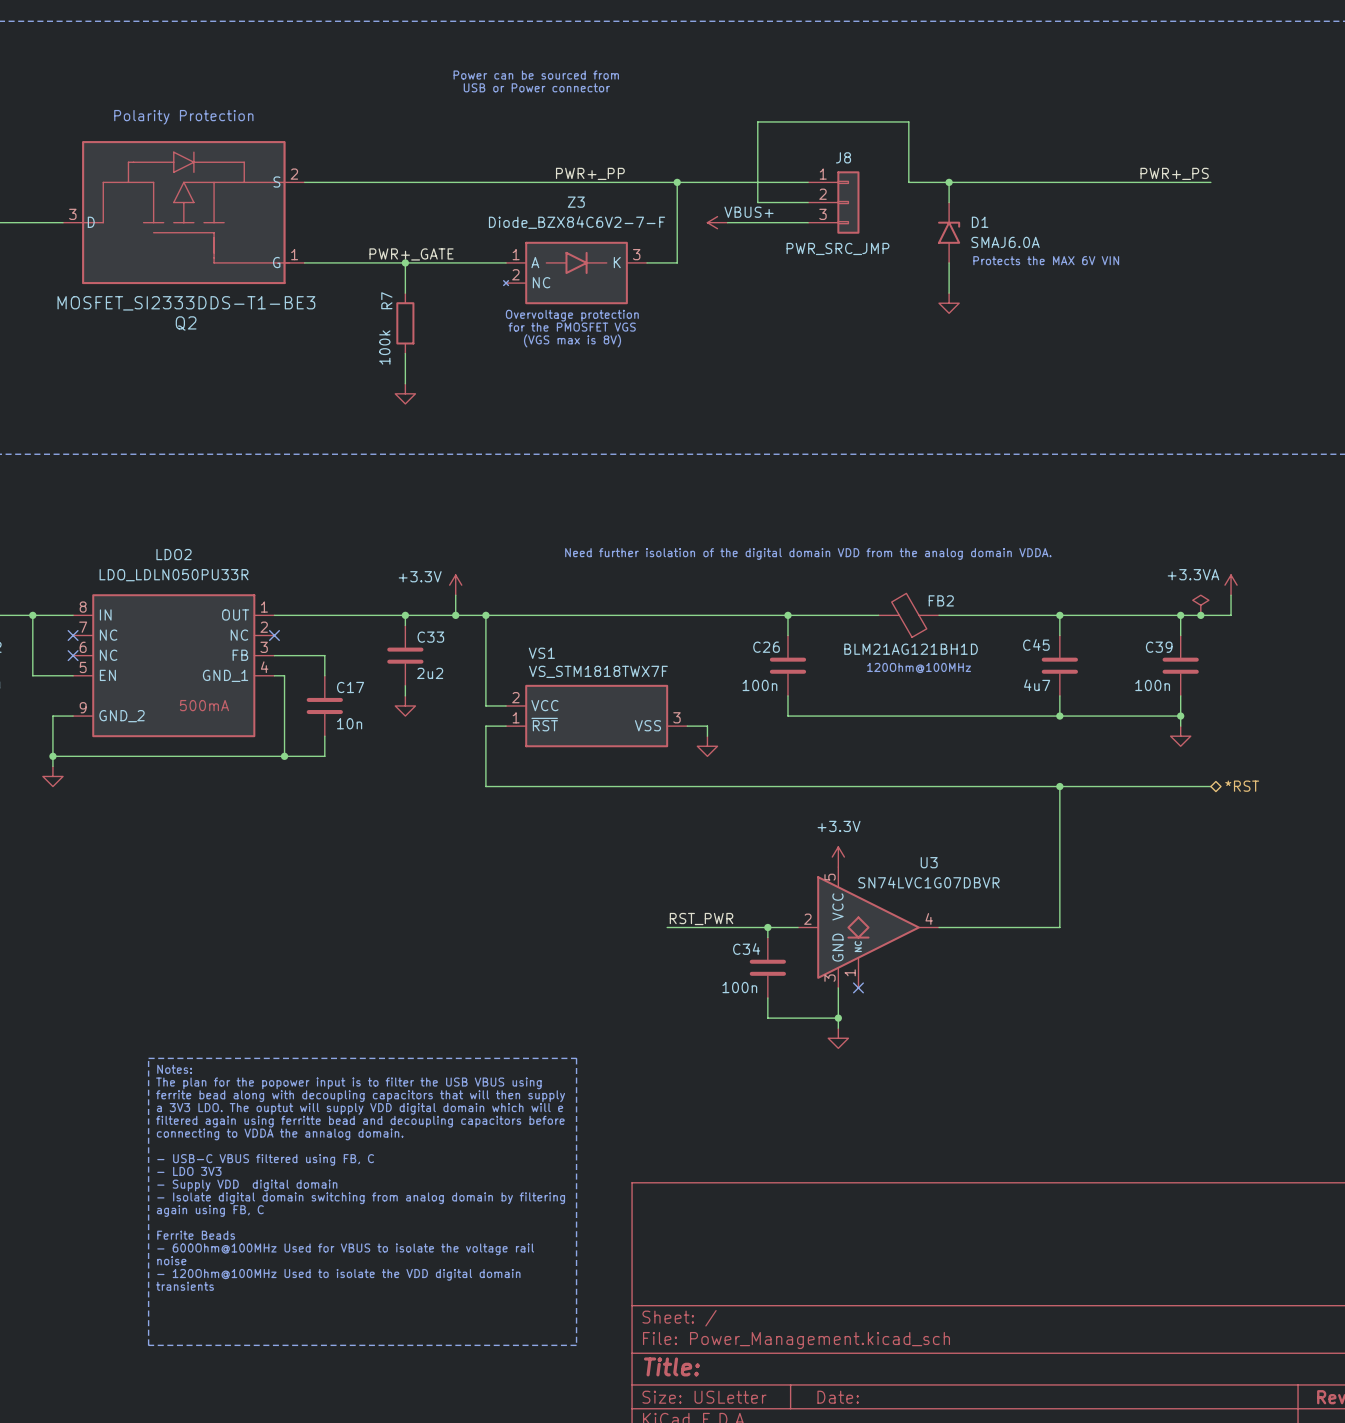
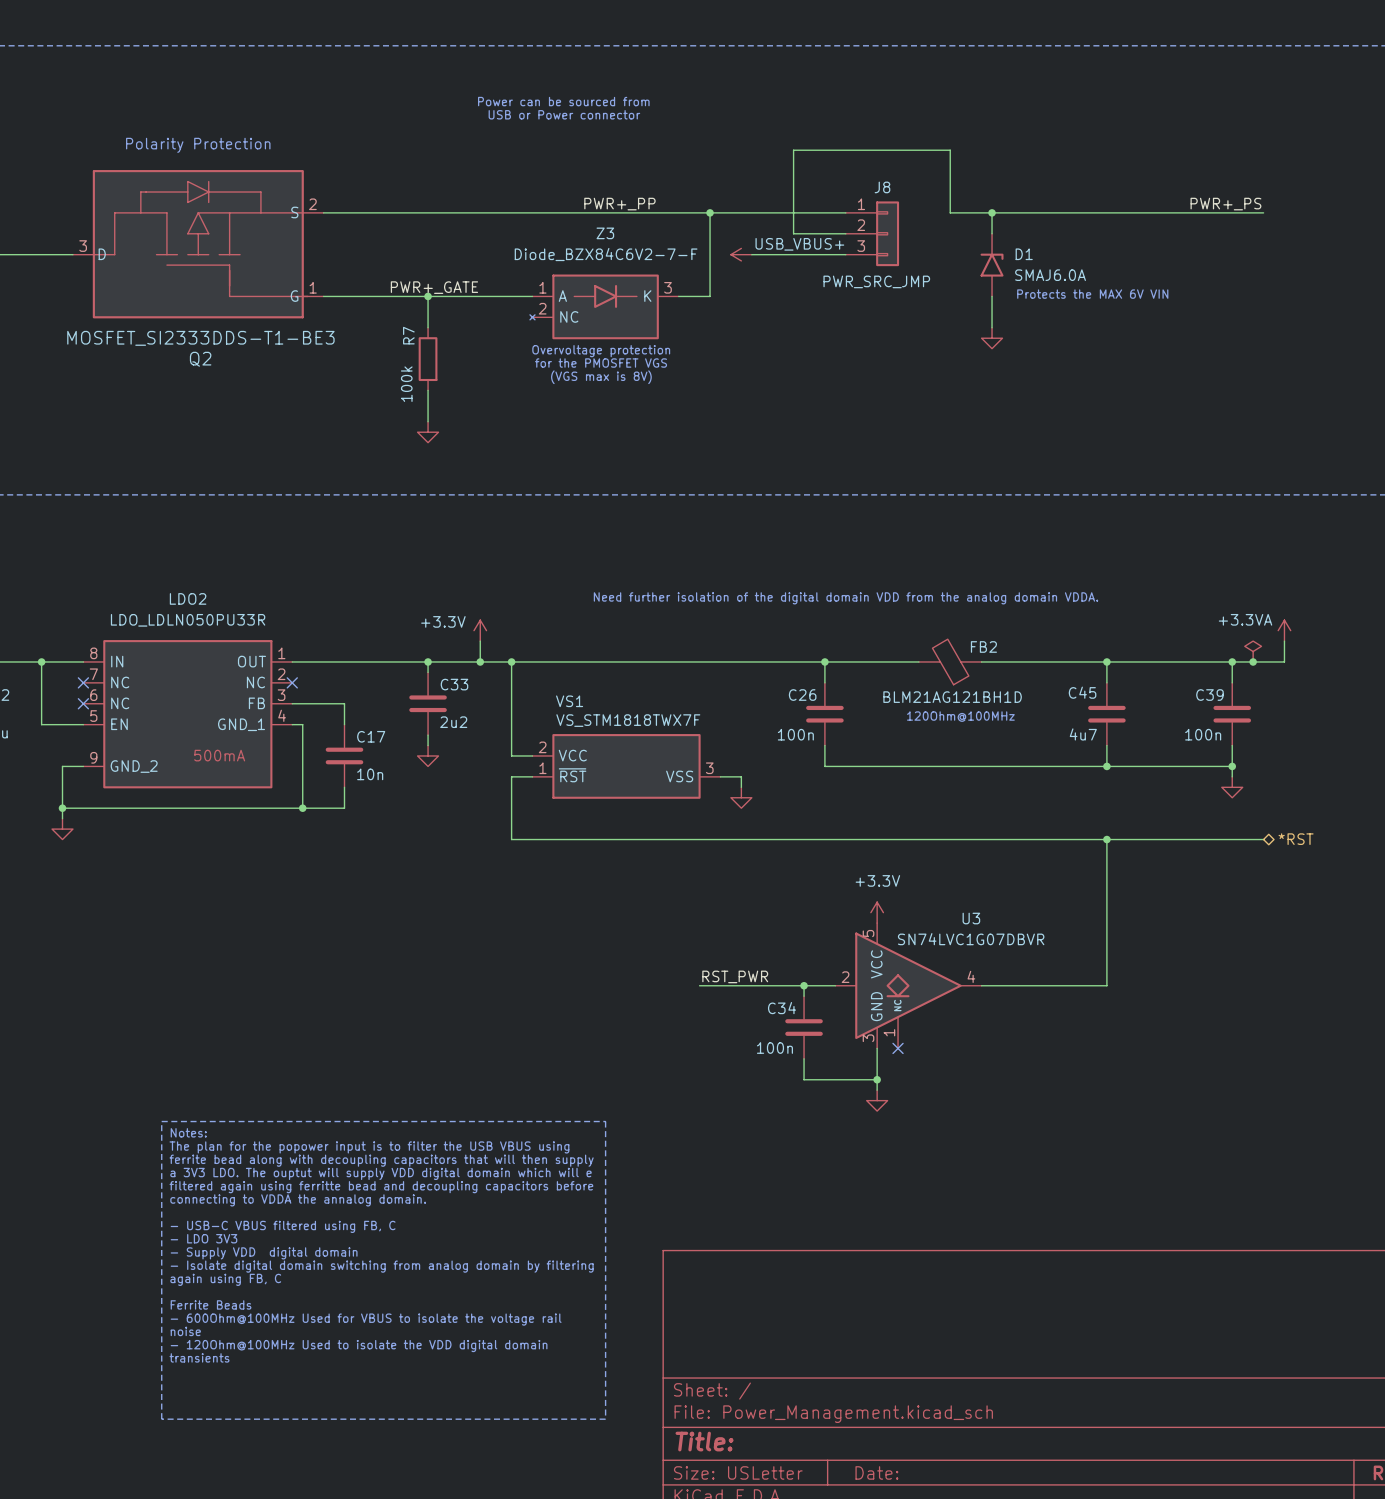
power symbol: none -> USB_VBUS+ (741, 254)
power symbol: VBUS+ (717, 222) -> none

